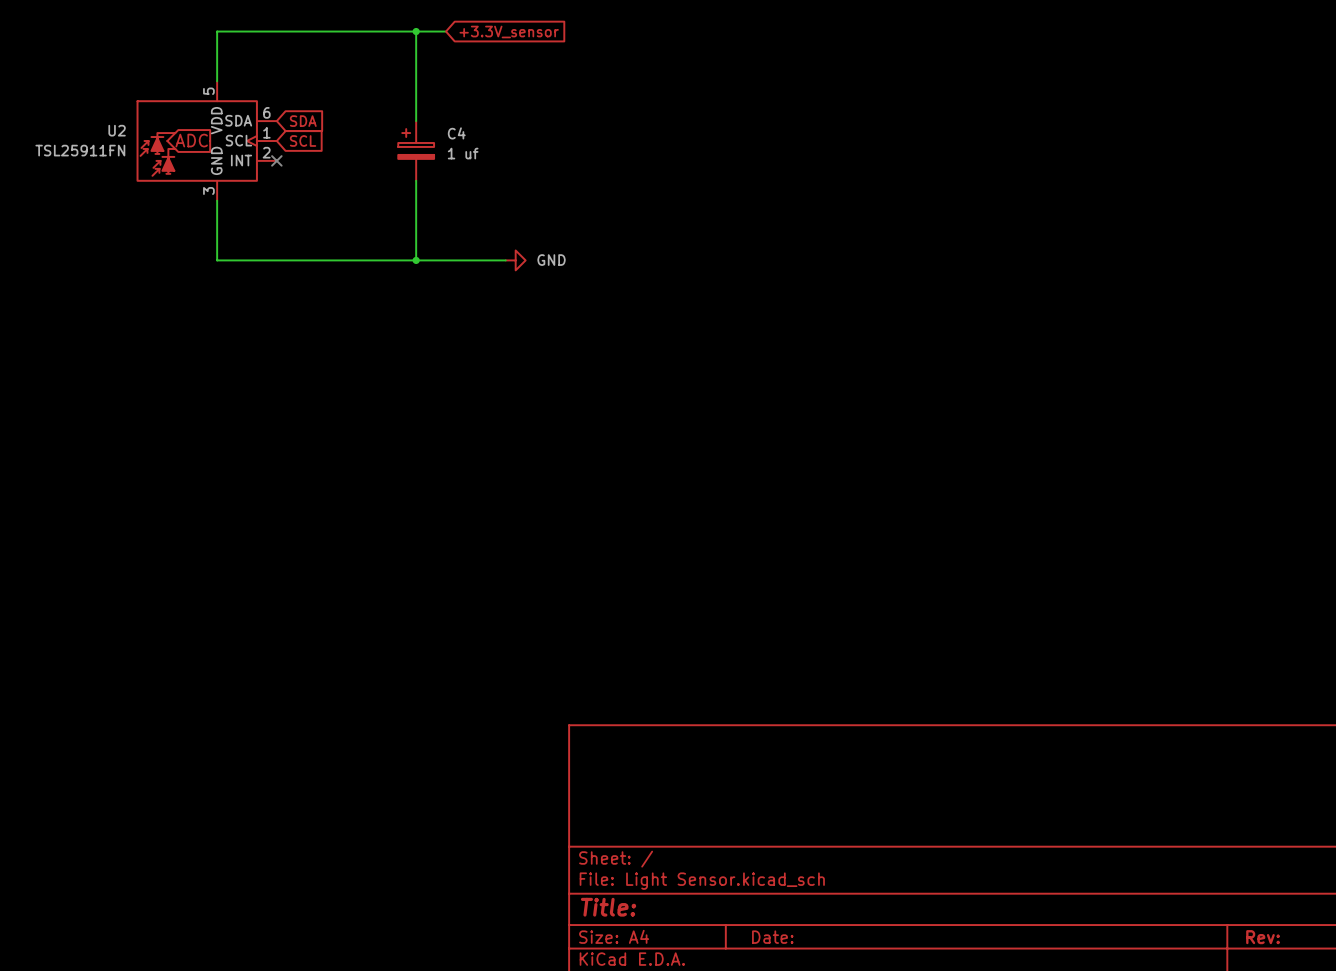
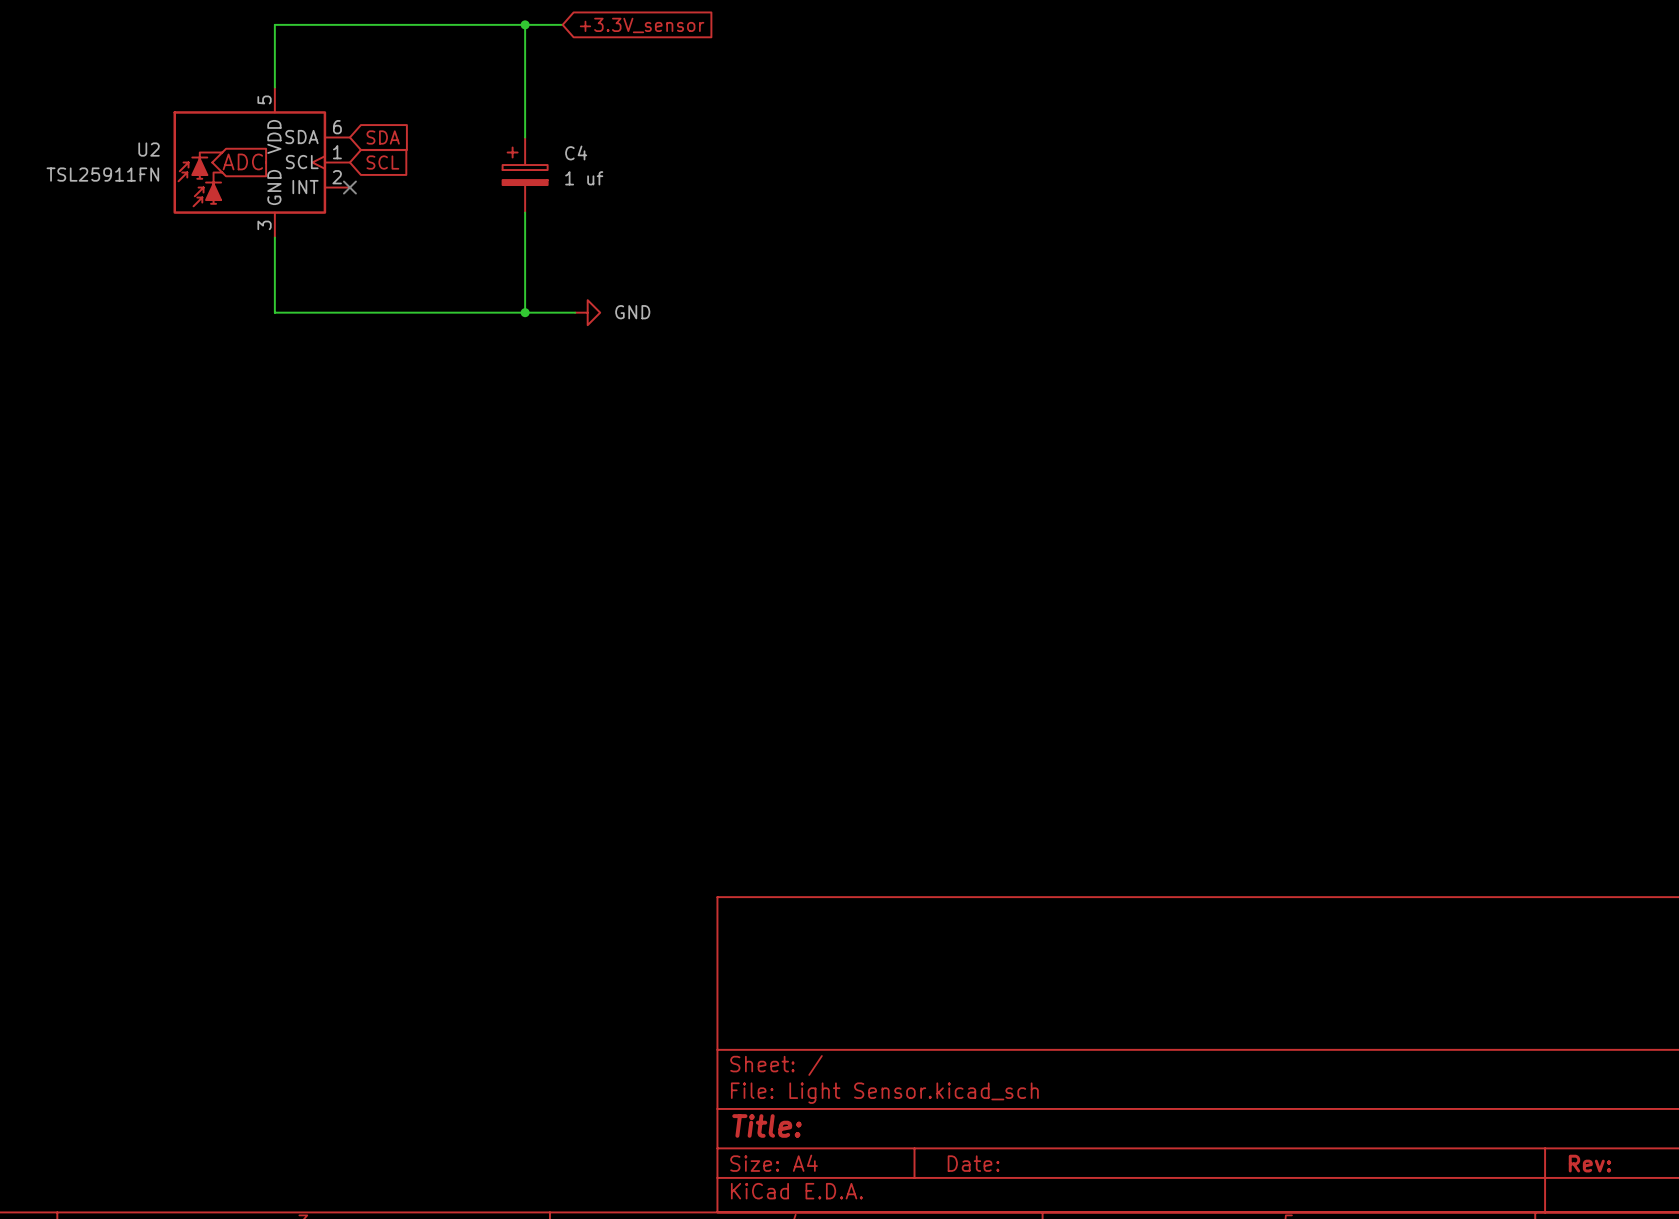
wire: (455, 260) (505, 260) -> none
power symbol position: GND (515, 260) -> GND (587, 312)

